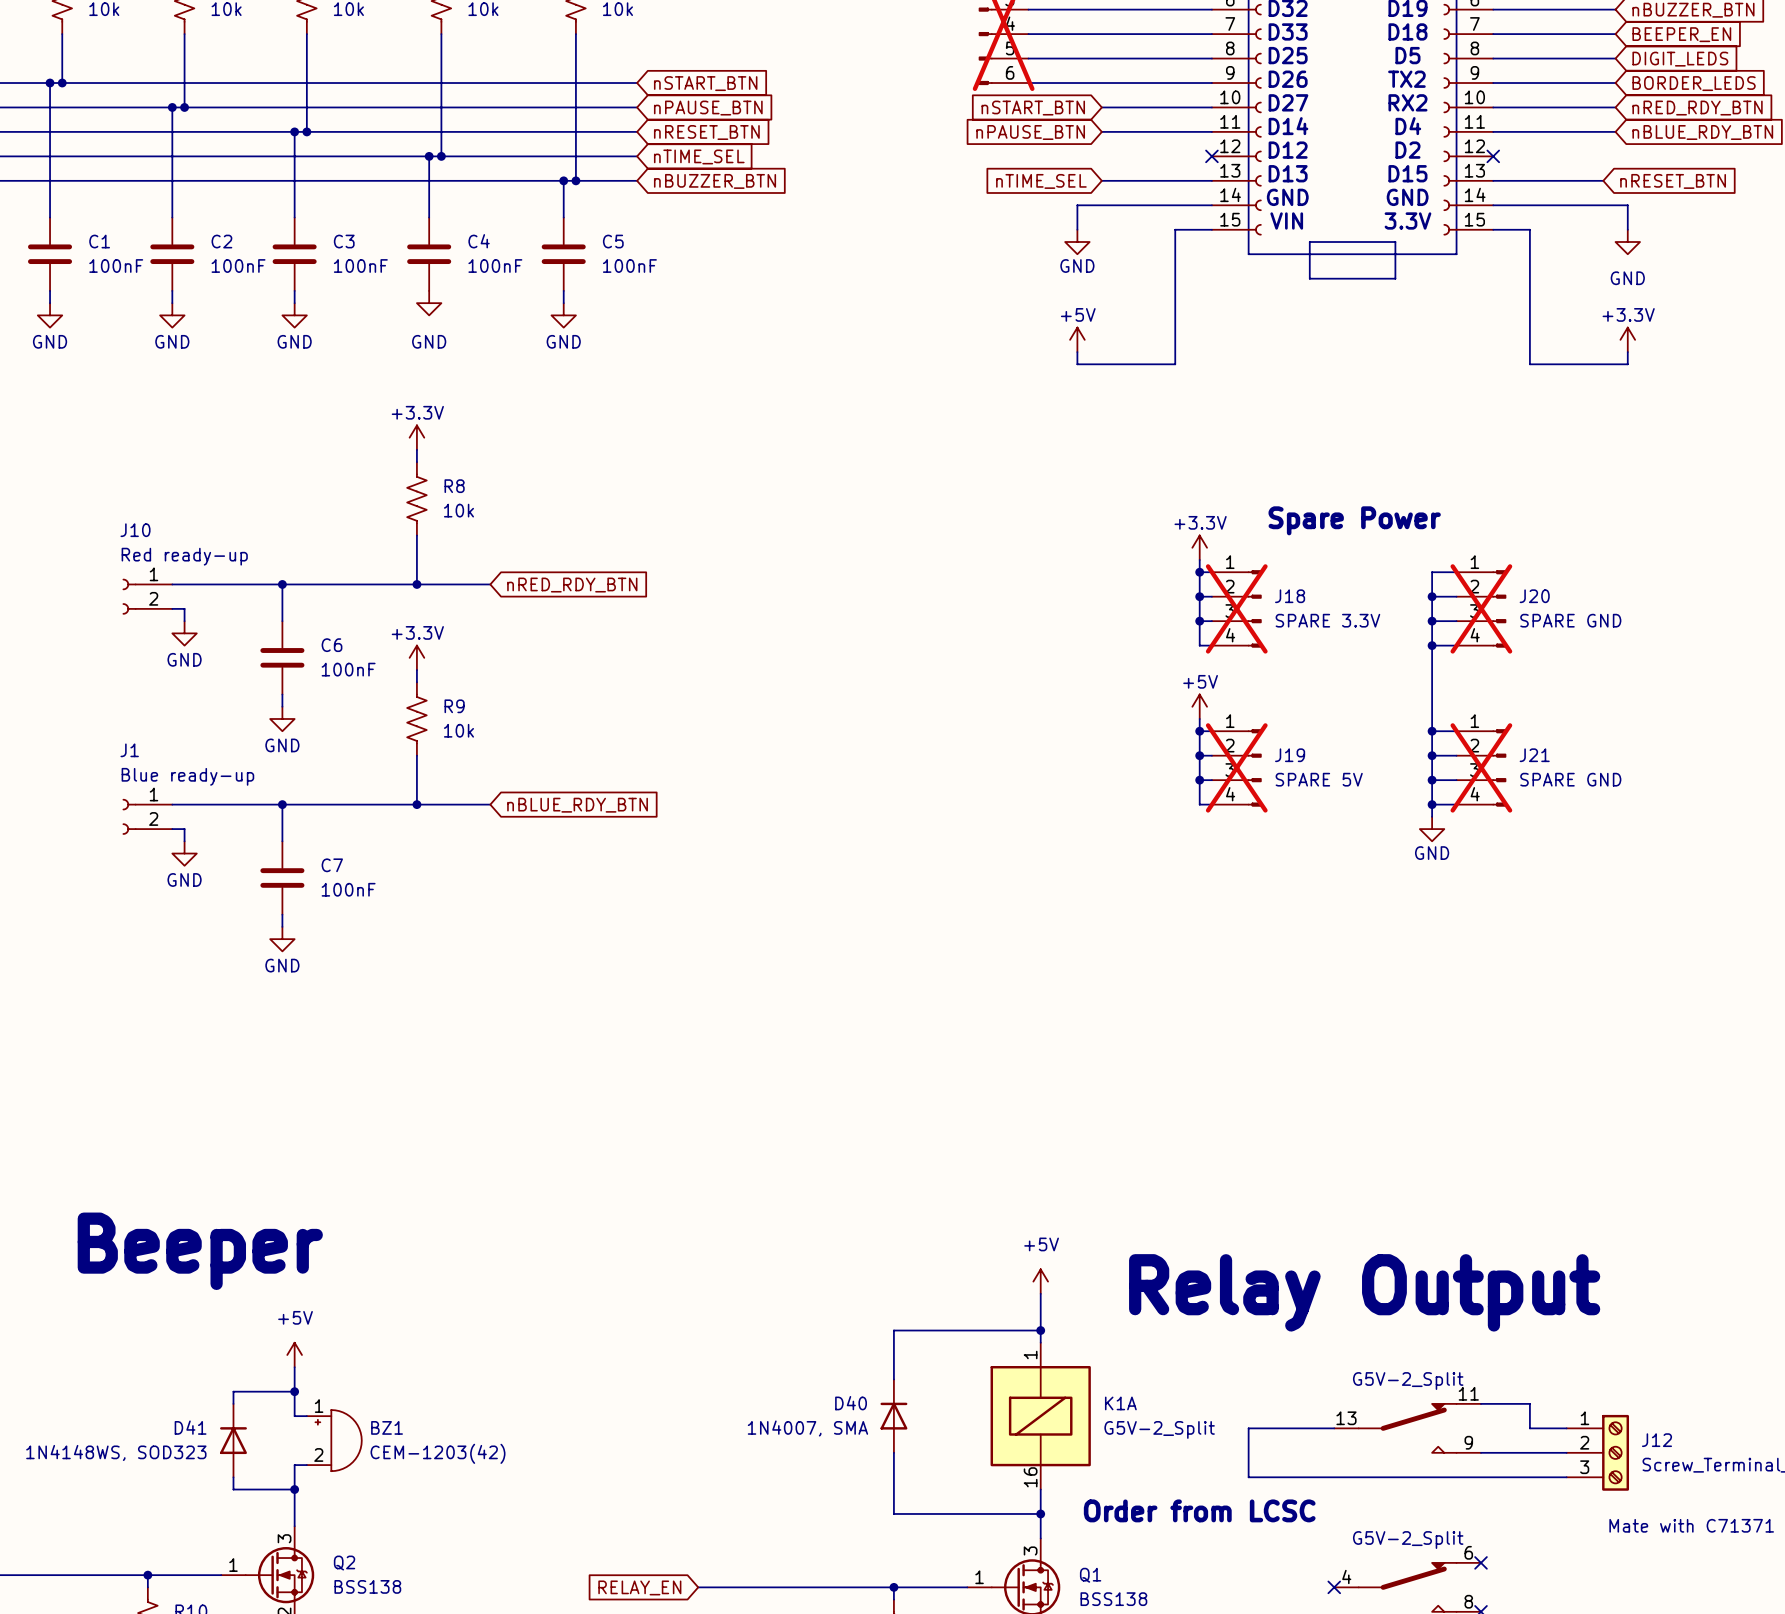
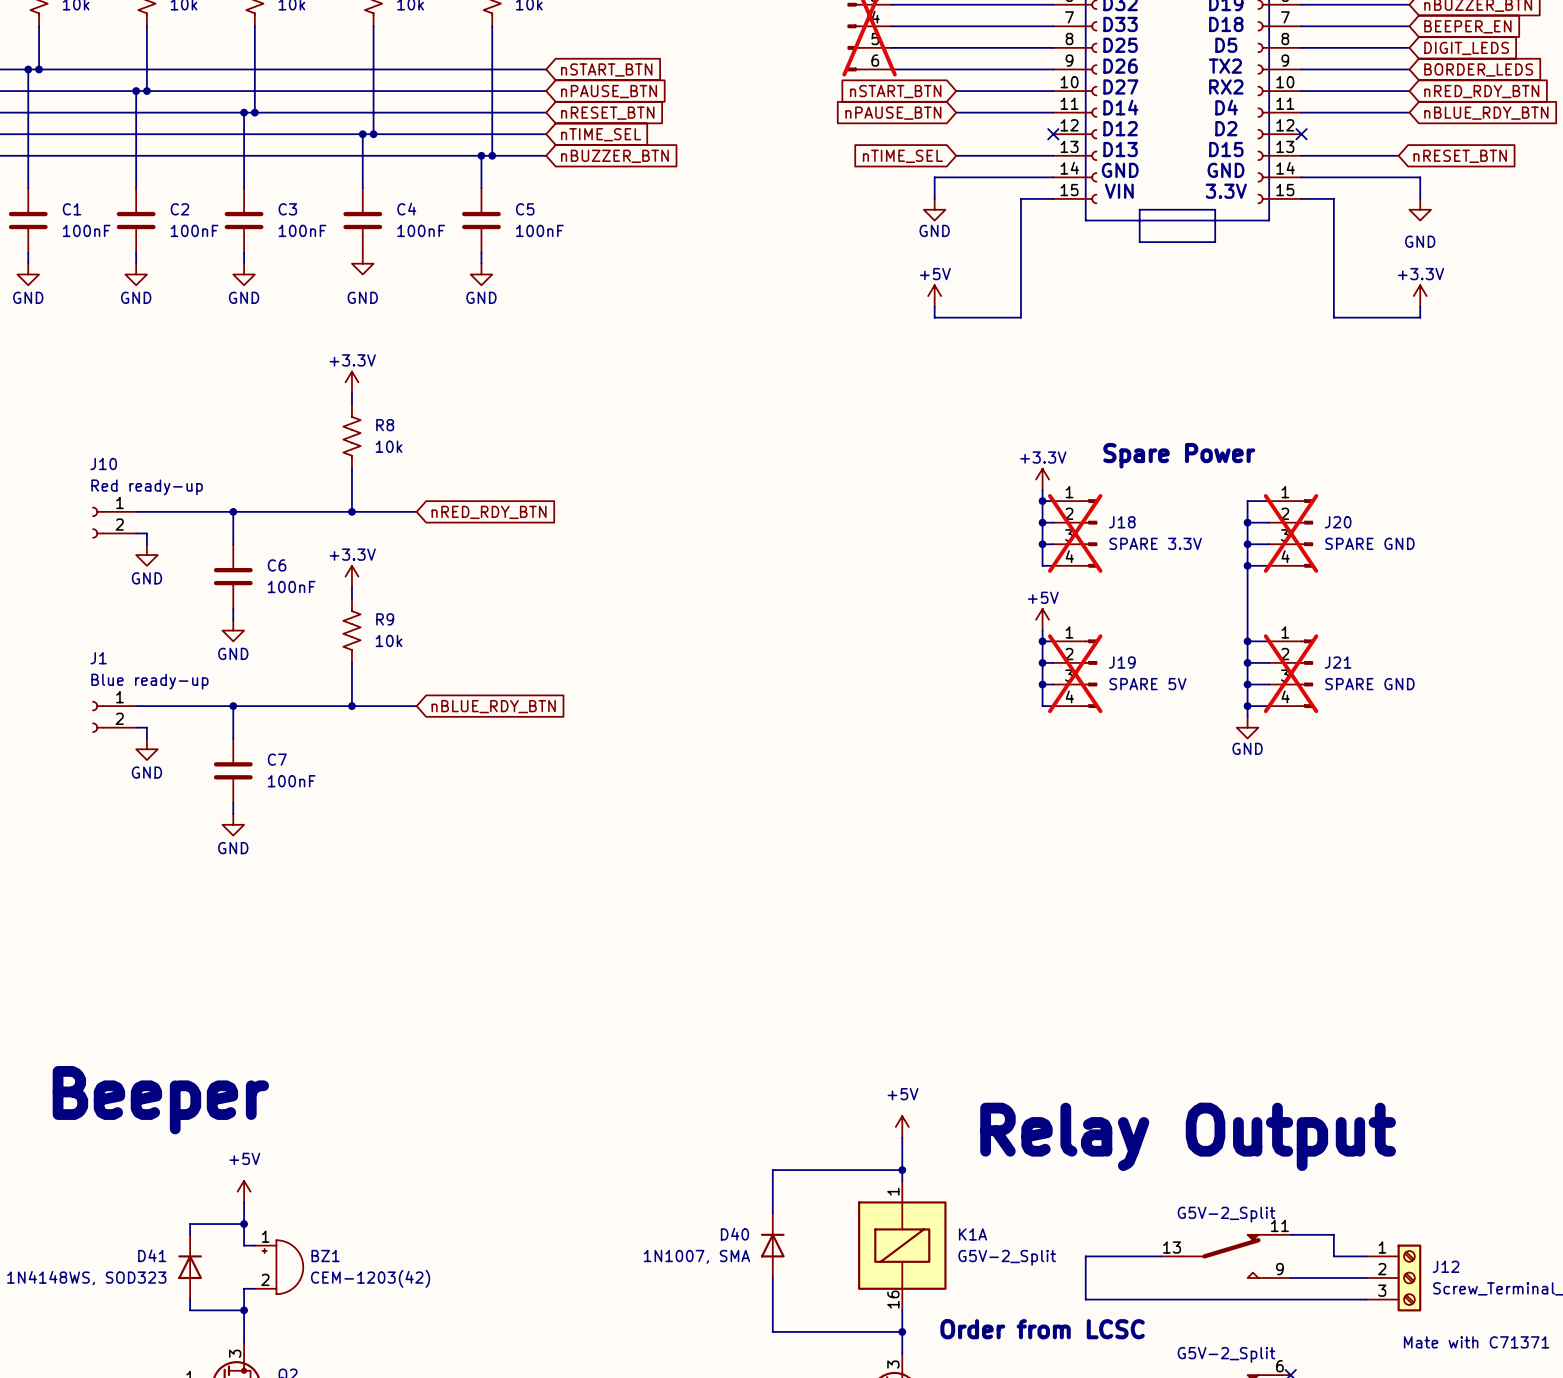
D40 value: 1N4007, SMA (807, 1428) -> 1N1007, SMA (696, 1256)

